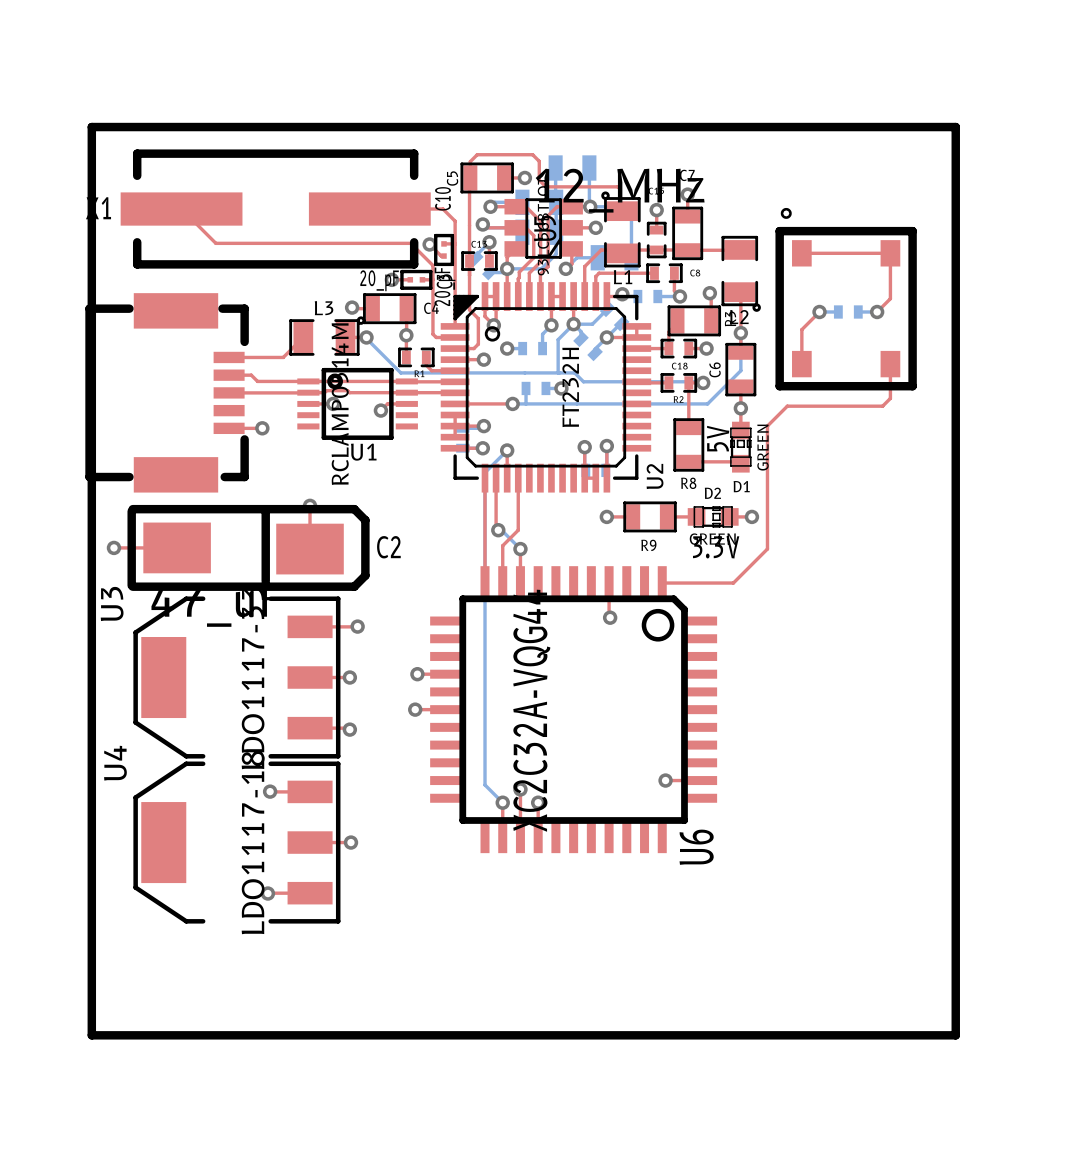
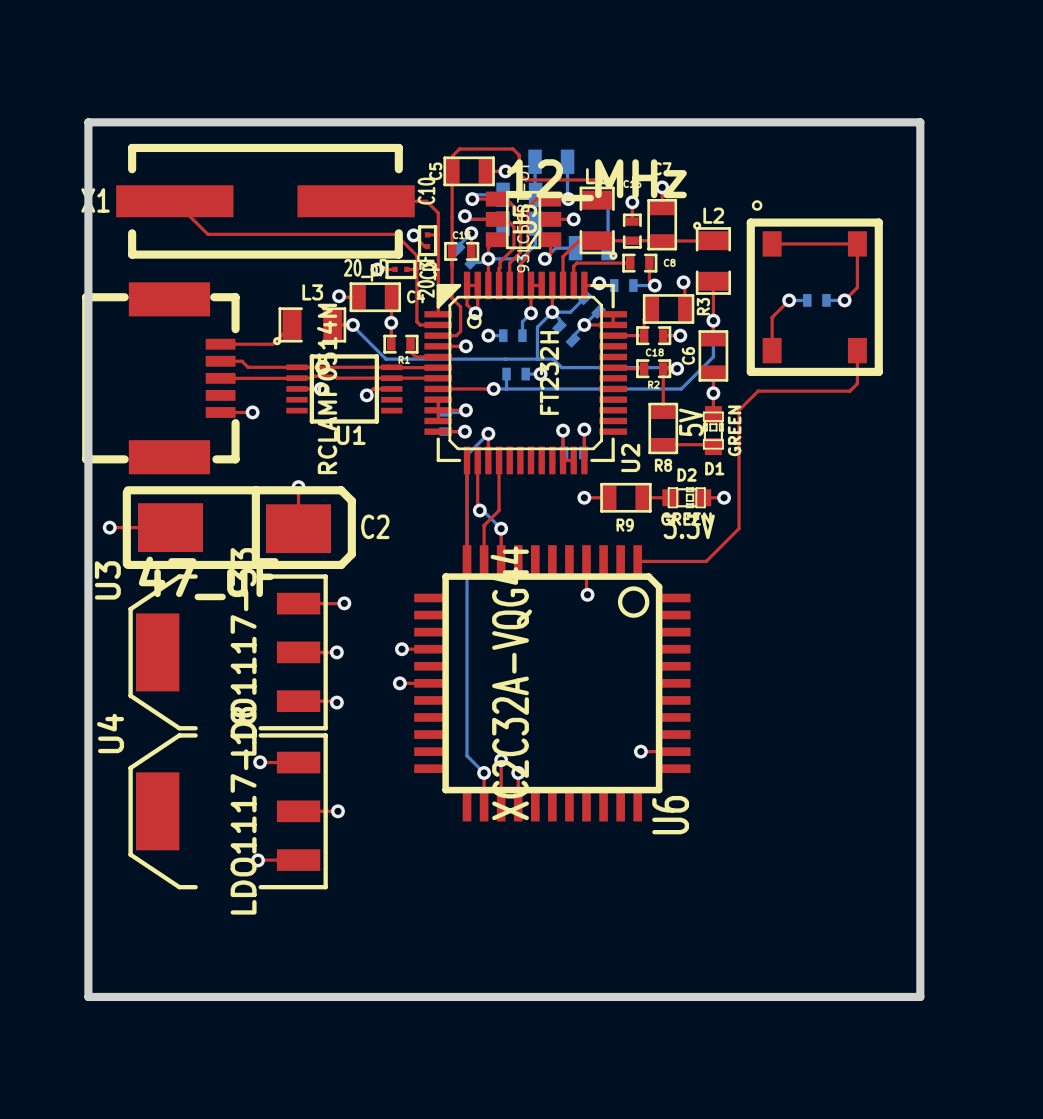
L1 rotation: 0° (620, 229) -> 180° (598, 223)
L2 rotation: 0° (741, 273) -> 180° (712, 258)
L3 rotation: 0° (327, 336) -> 180° (309, 326)

